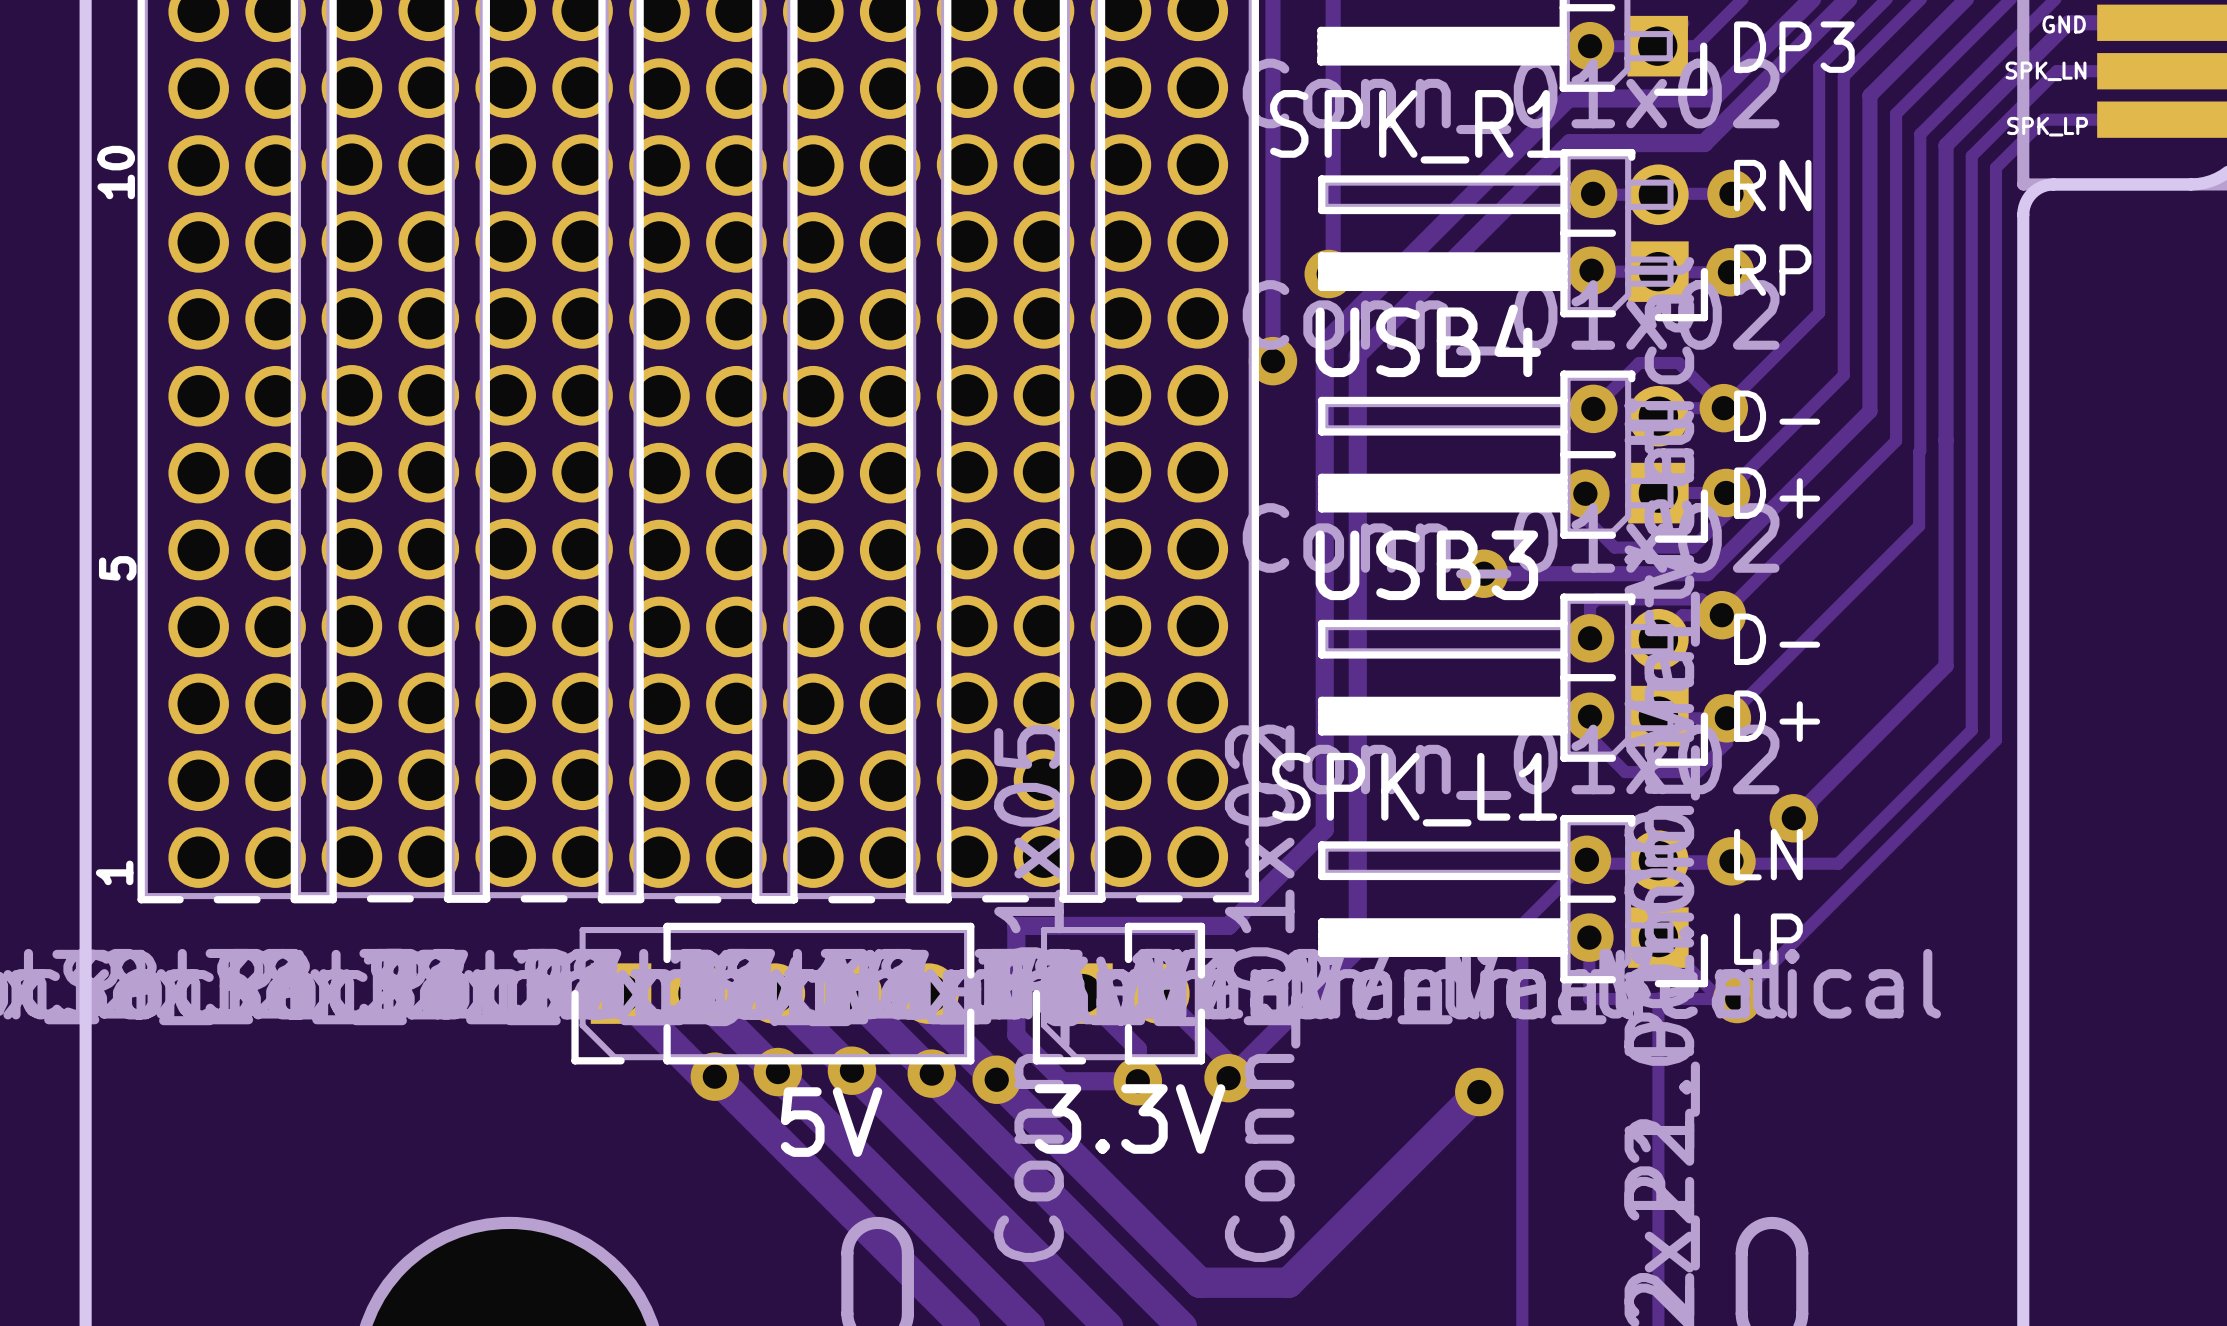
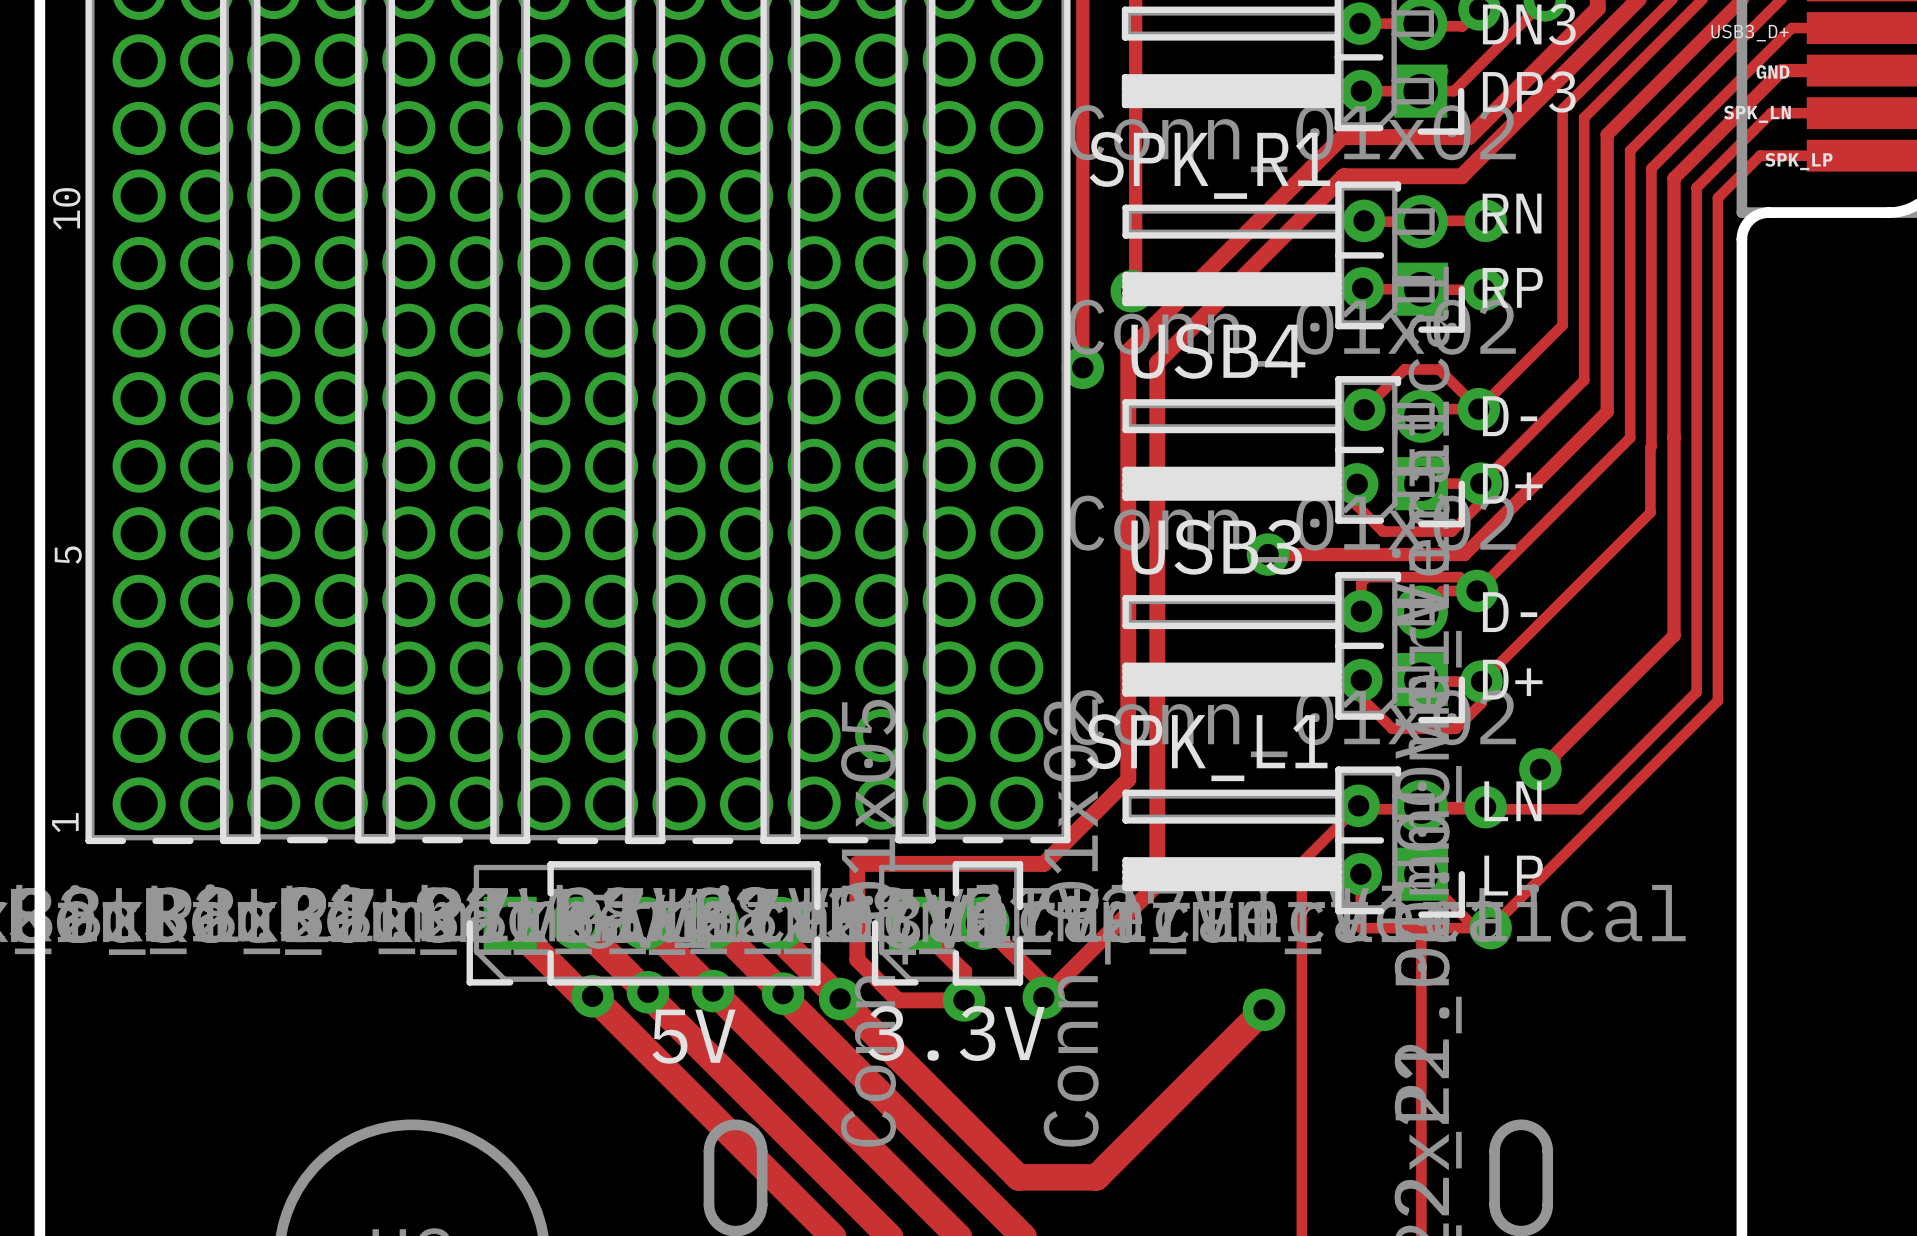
text position: SPK_LP (2047, 126) -> SPK_LP (1798, 161)

